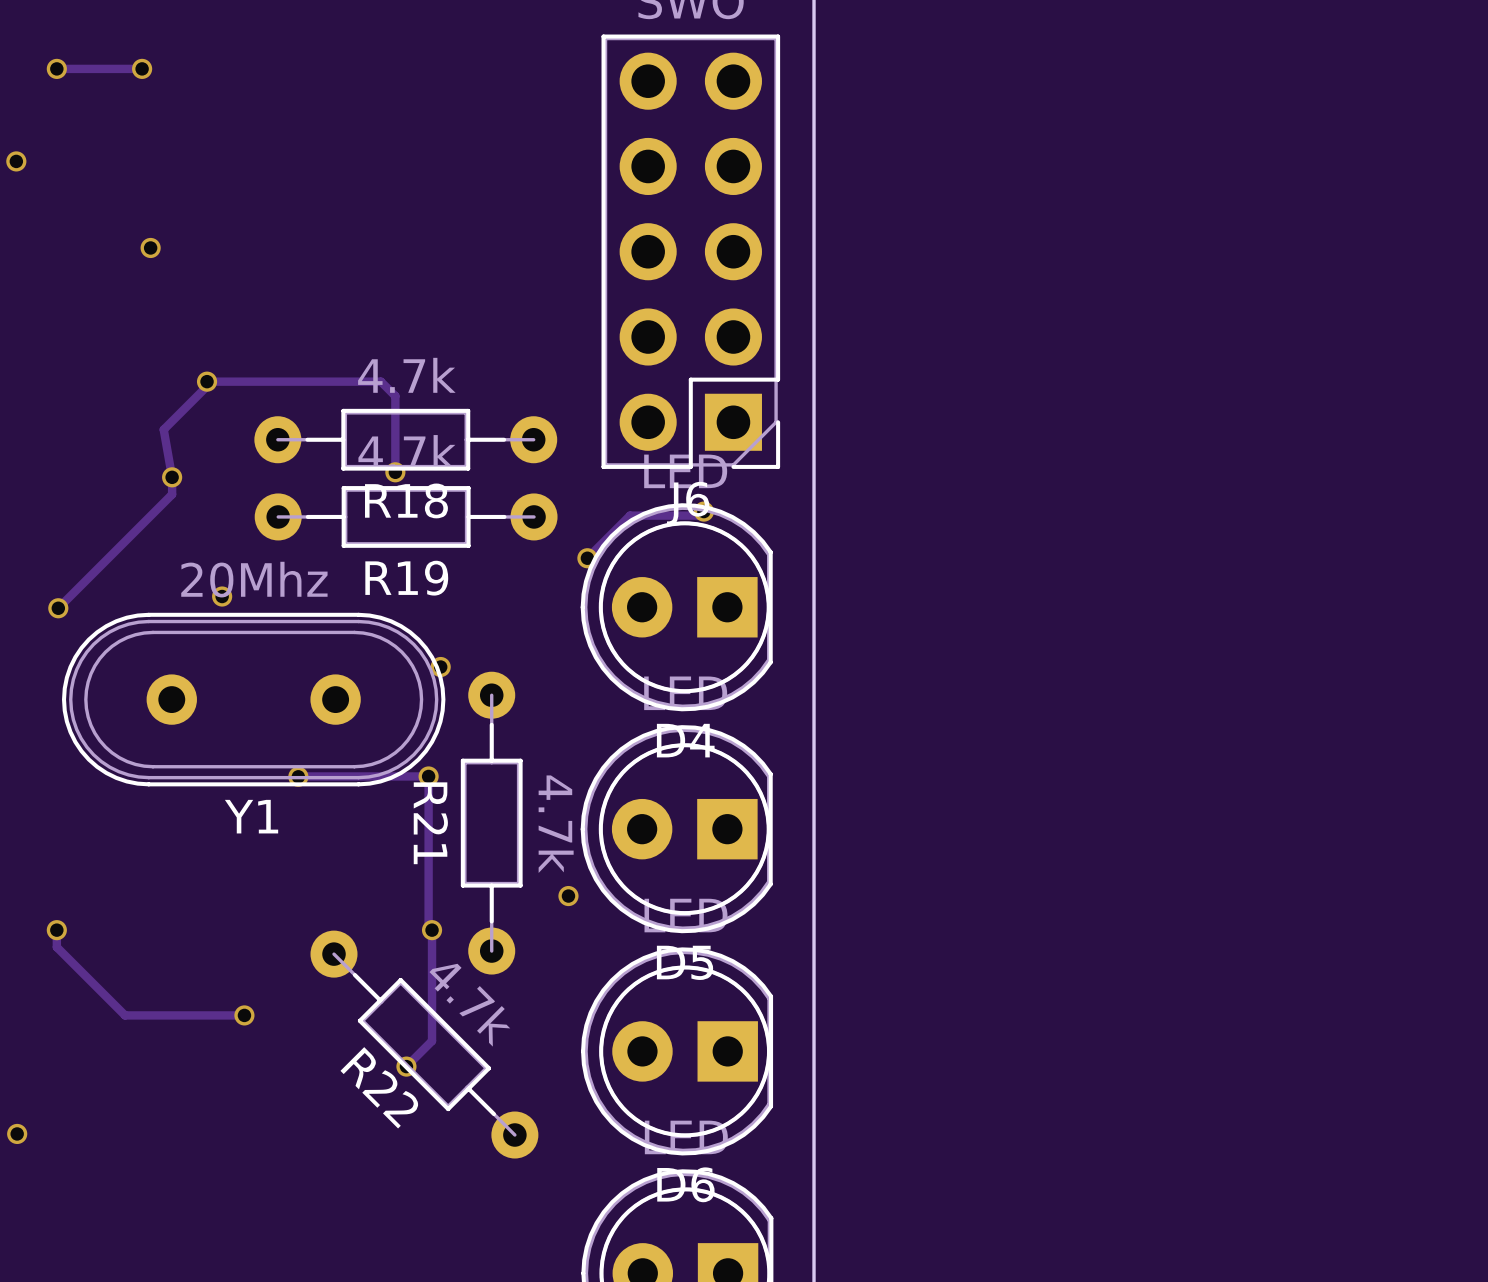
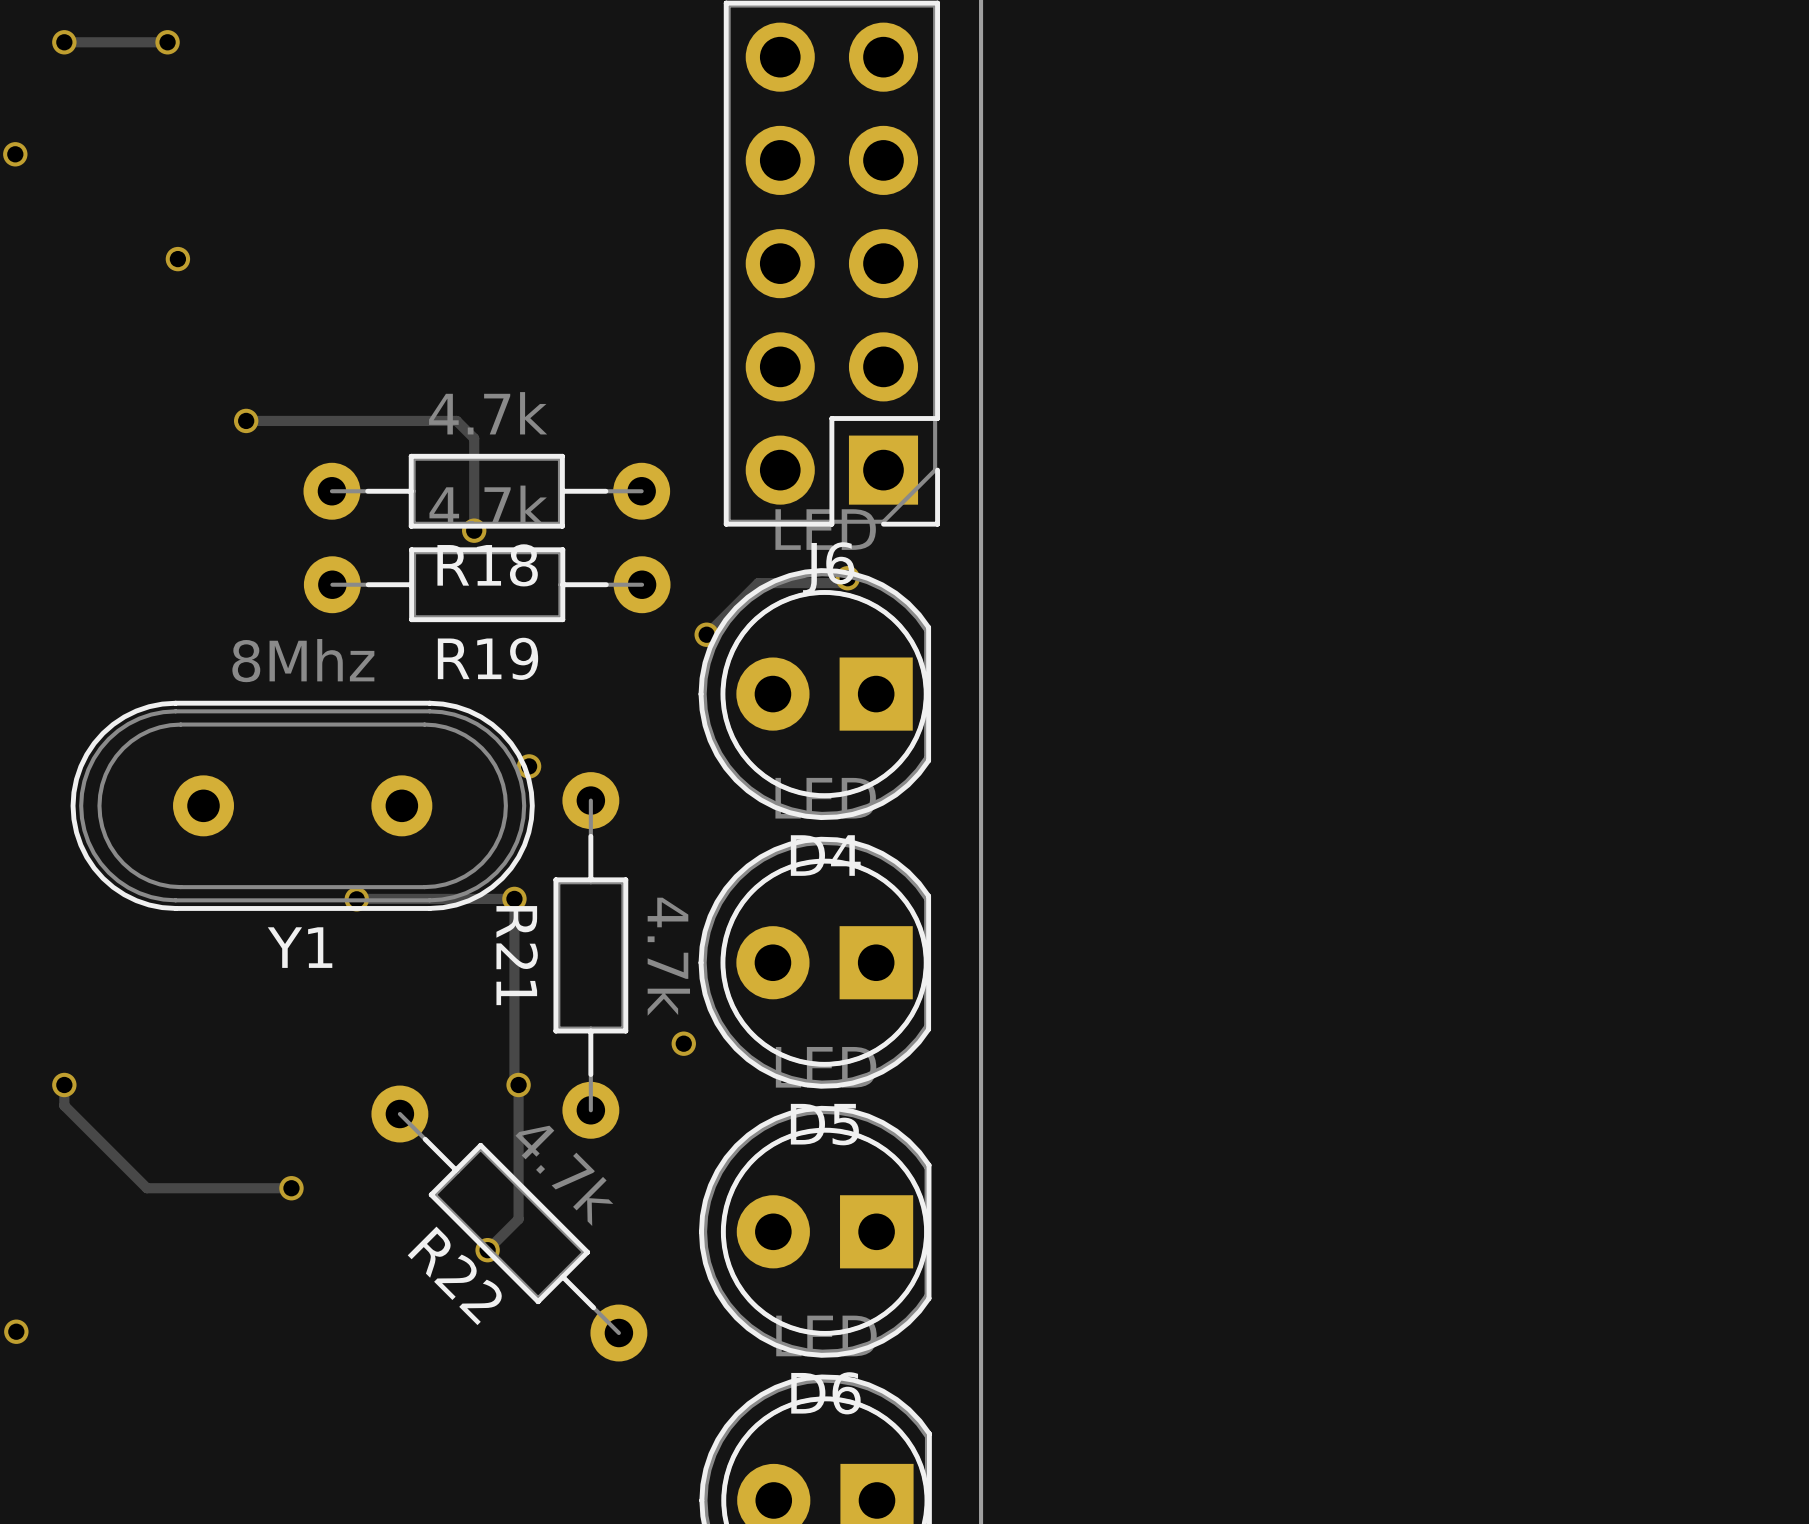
track: (207, 381) (207, 386) (163, 429) (172, 477) (172, 494) (58, 608) -> none
via: (172, 477) -> none
Y1 value: 20Mhz (254, 579) -> 8Mhz (303, 660)
via: (222, 596) -> none
via: (58, 608) -> none

